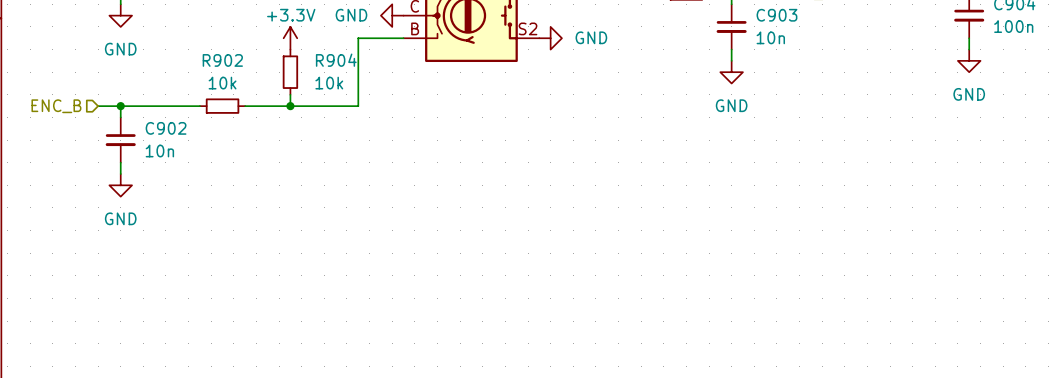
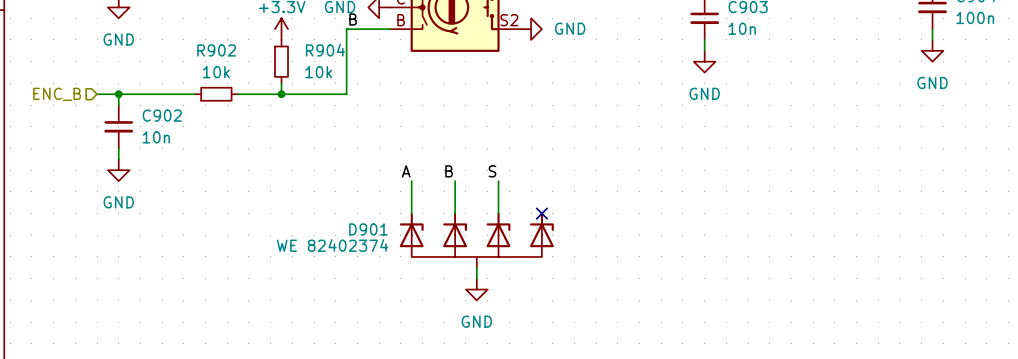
label: none -> B (353, 19)
label: none -> A (406, 171)
label: none -> B (449, 171)
label: none -> S (492, 171)
wire: none -> (411, 181) (411, 213)
wire: none -> (455, 181) (455, 213)
wire: none -> (498, 181) (498, 213)
no-connect mark: none -> (541, 213)
D901: none -> WE 82402374 (476, 240)
wire: none -> (476, 267) (476, 278)
power symbol: none -> GND (476, 289)

